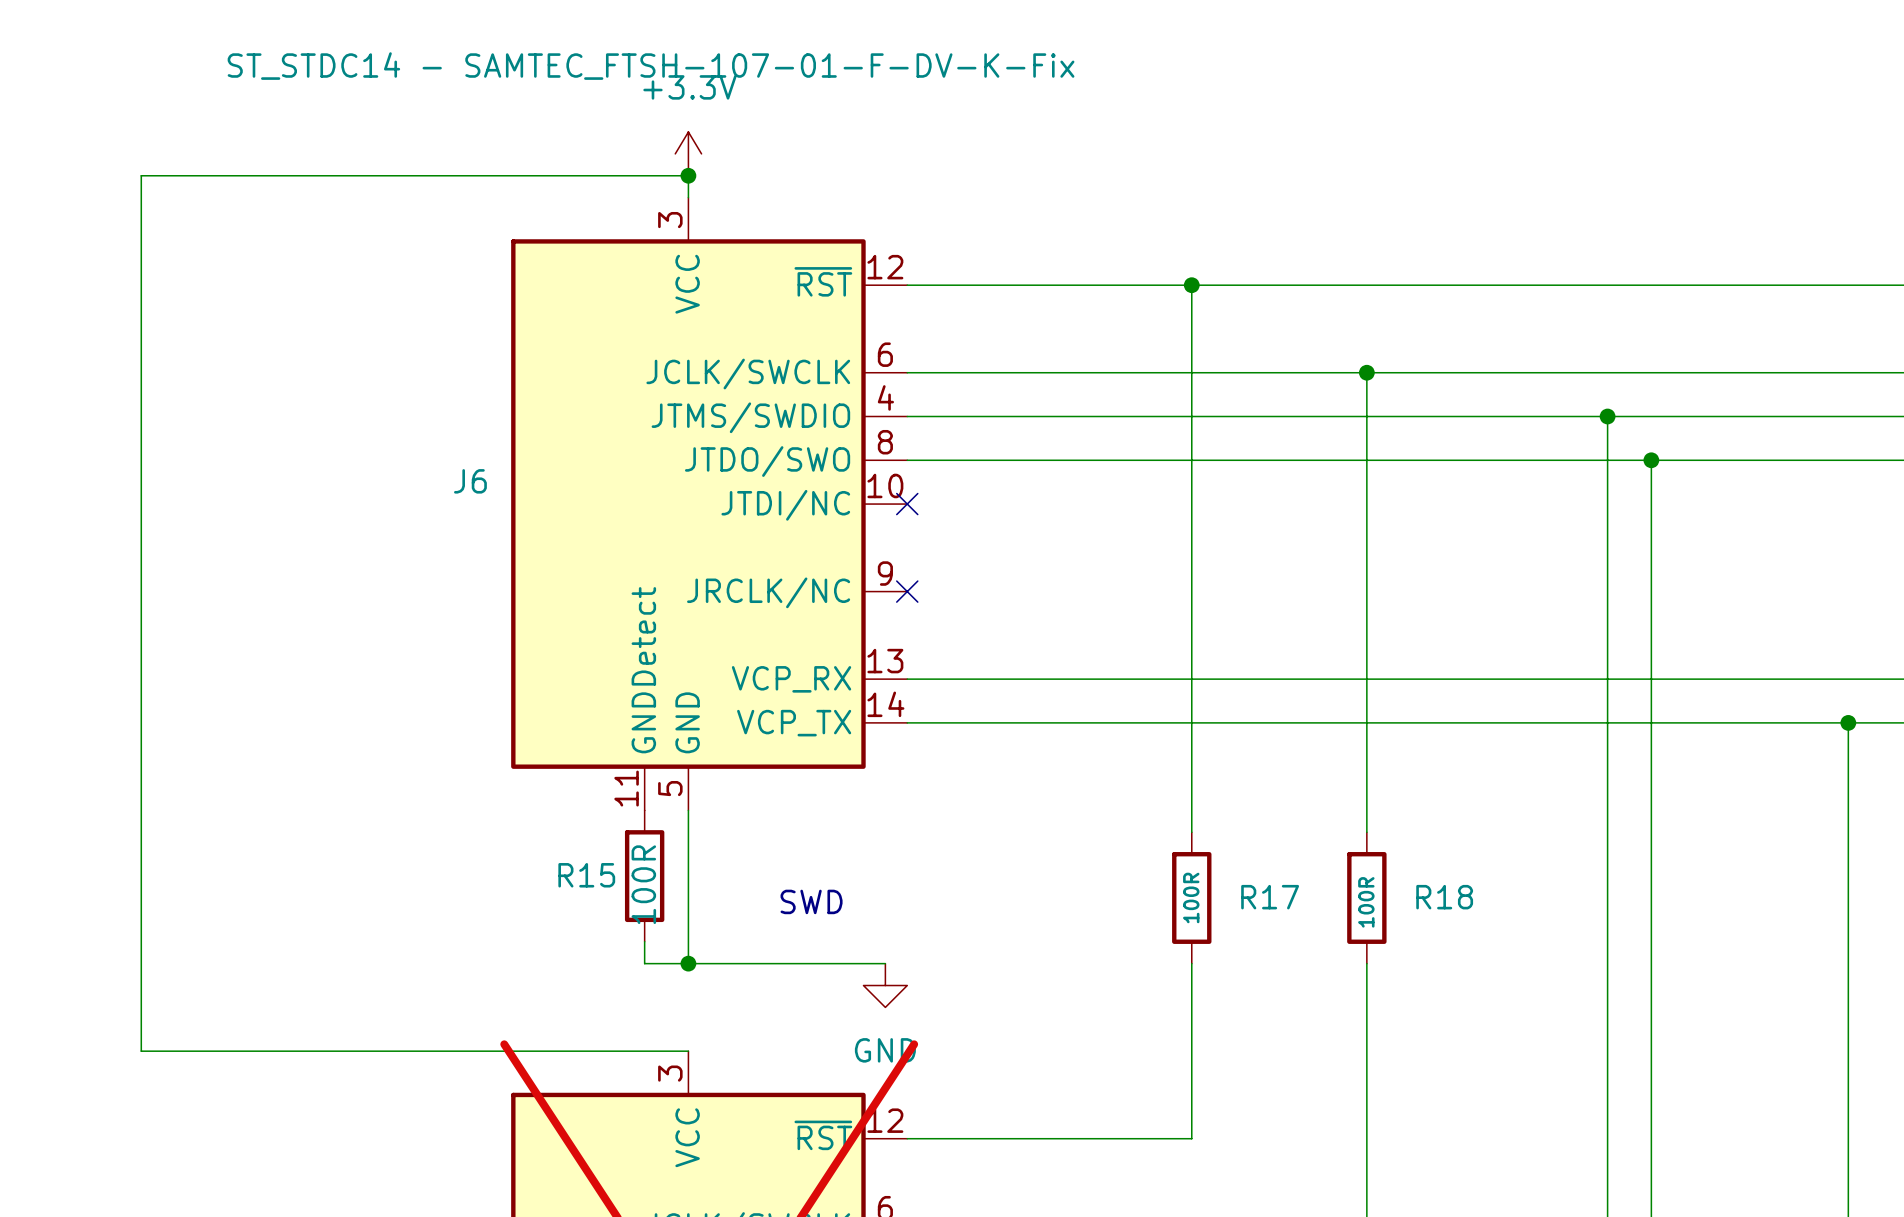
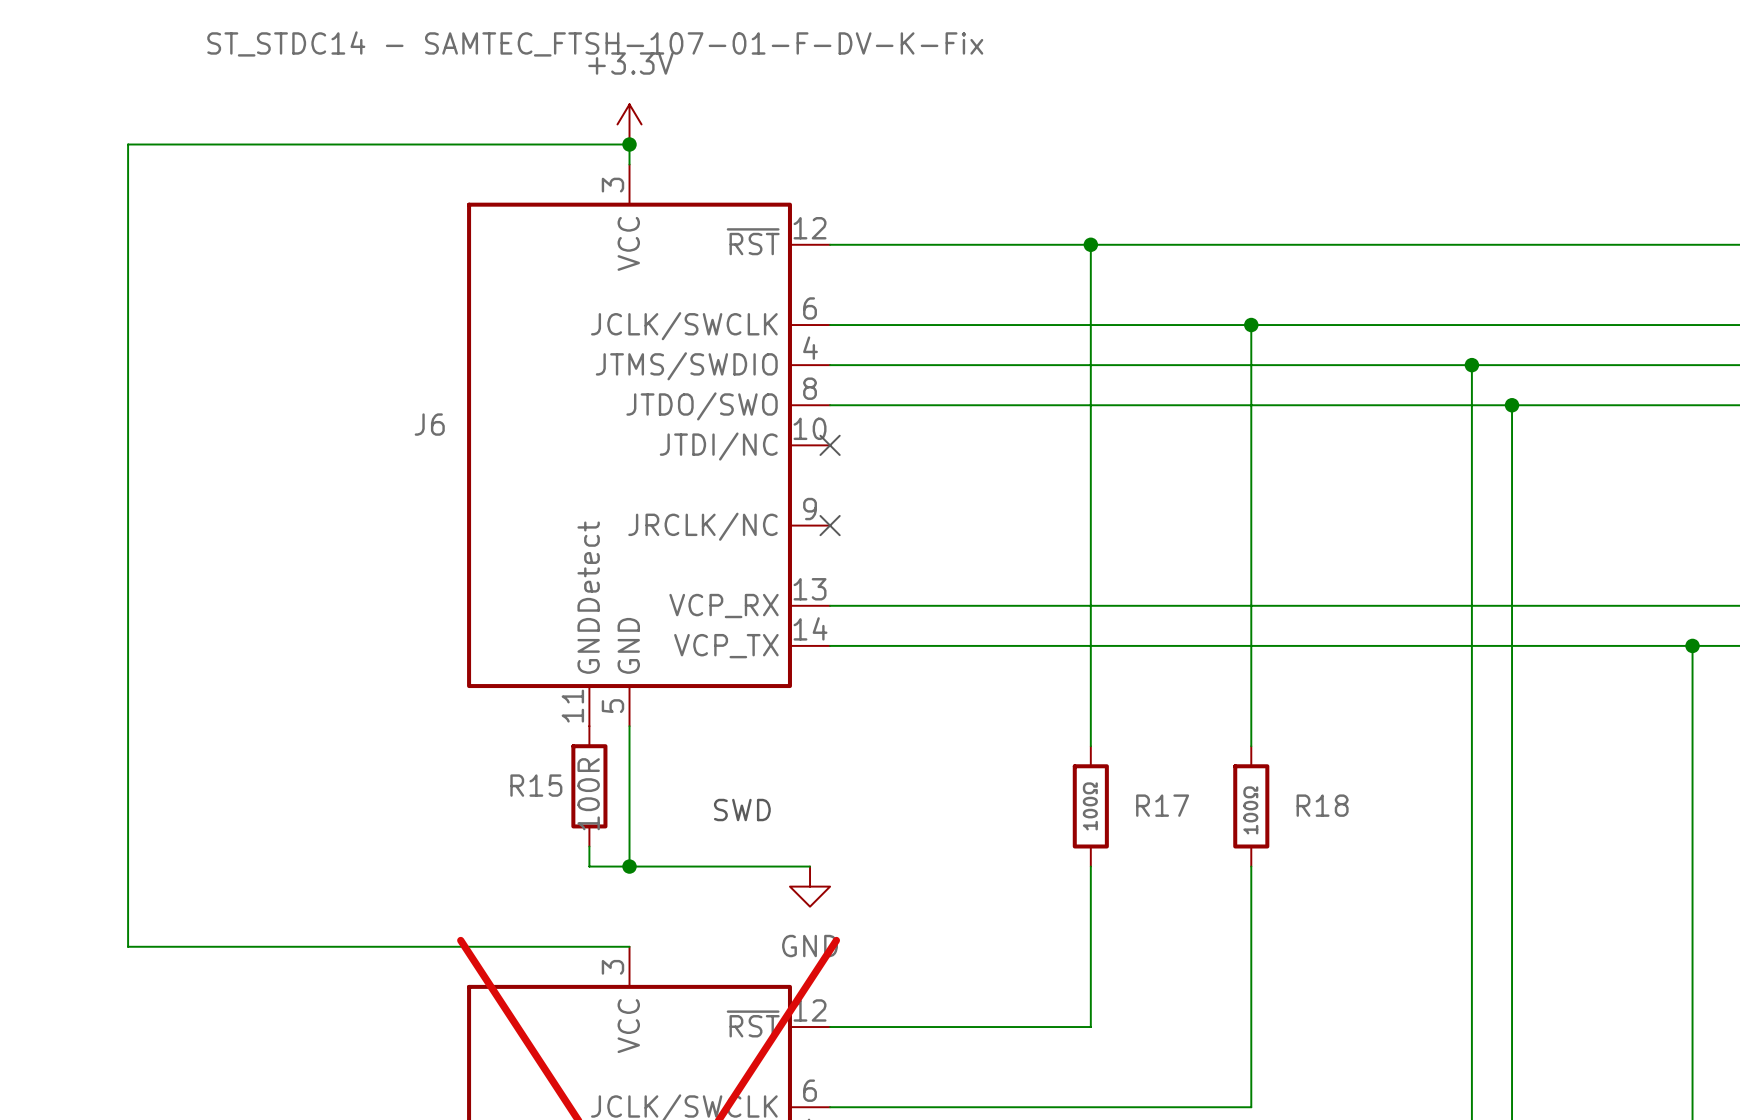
R17 value: 100R (1191, 897) -> 100Ω (1090, 806)
R18 value: 100R (1366, 902) -> 100Ω (1250, 810)

